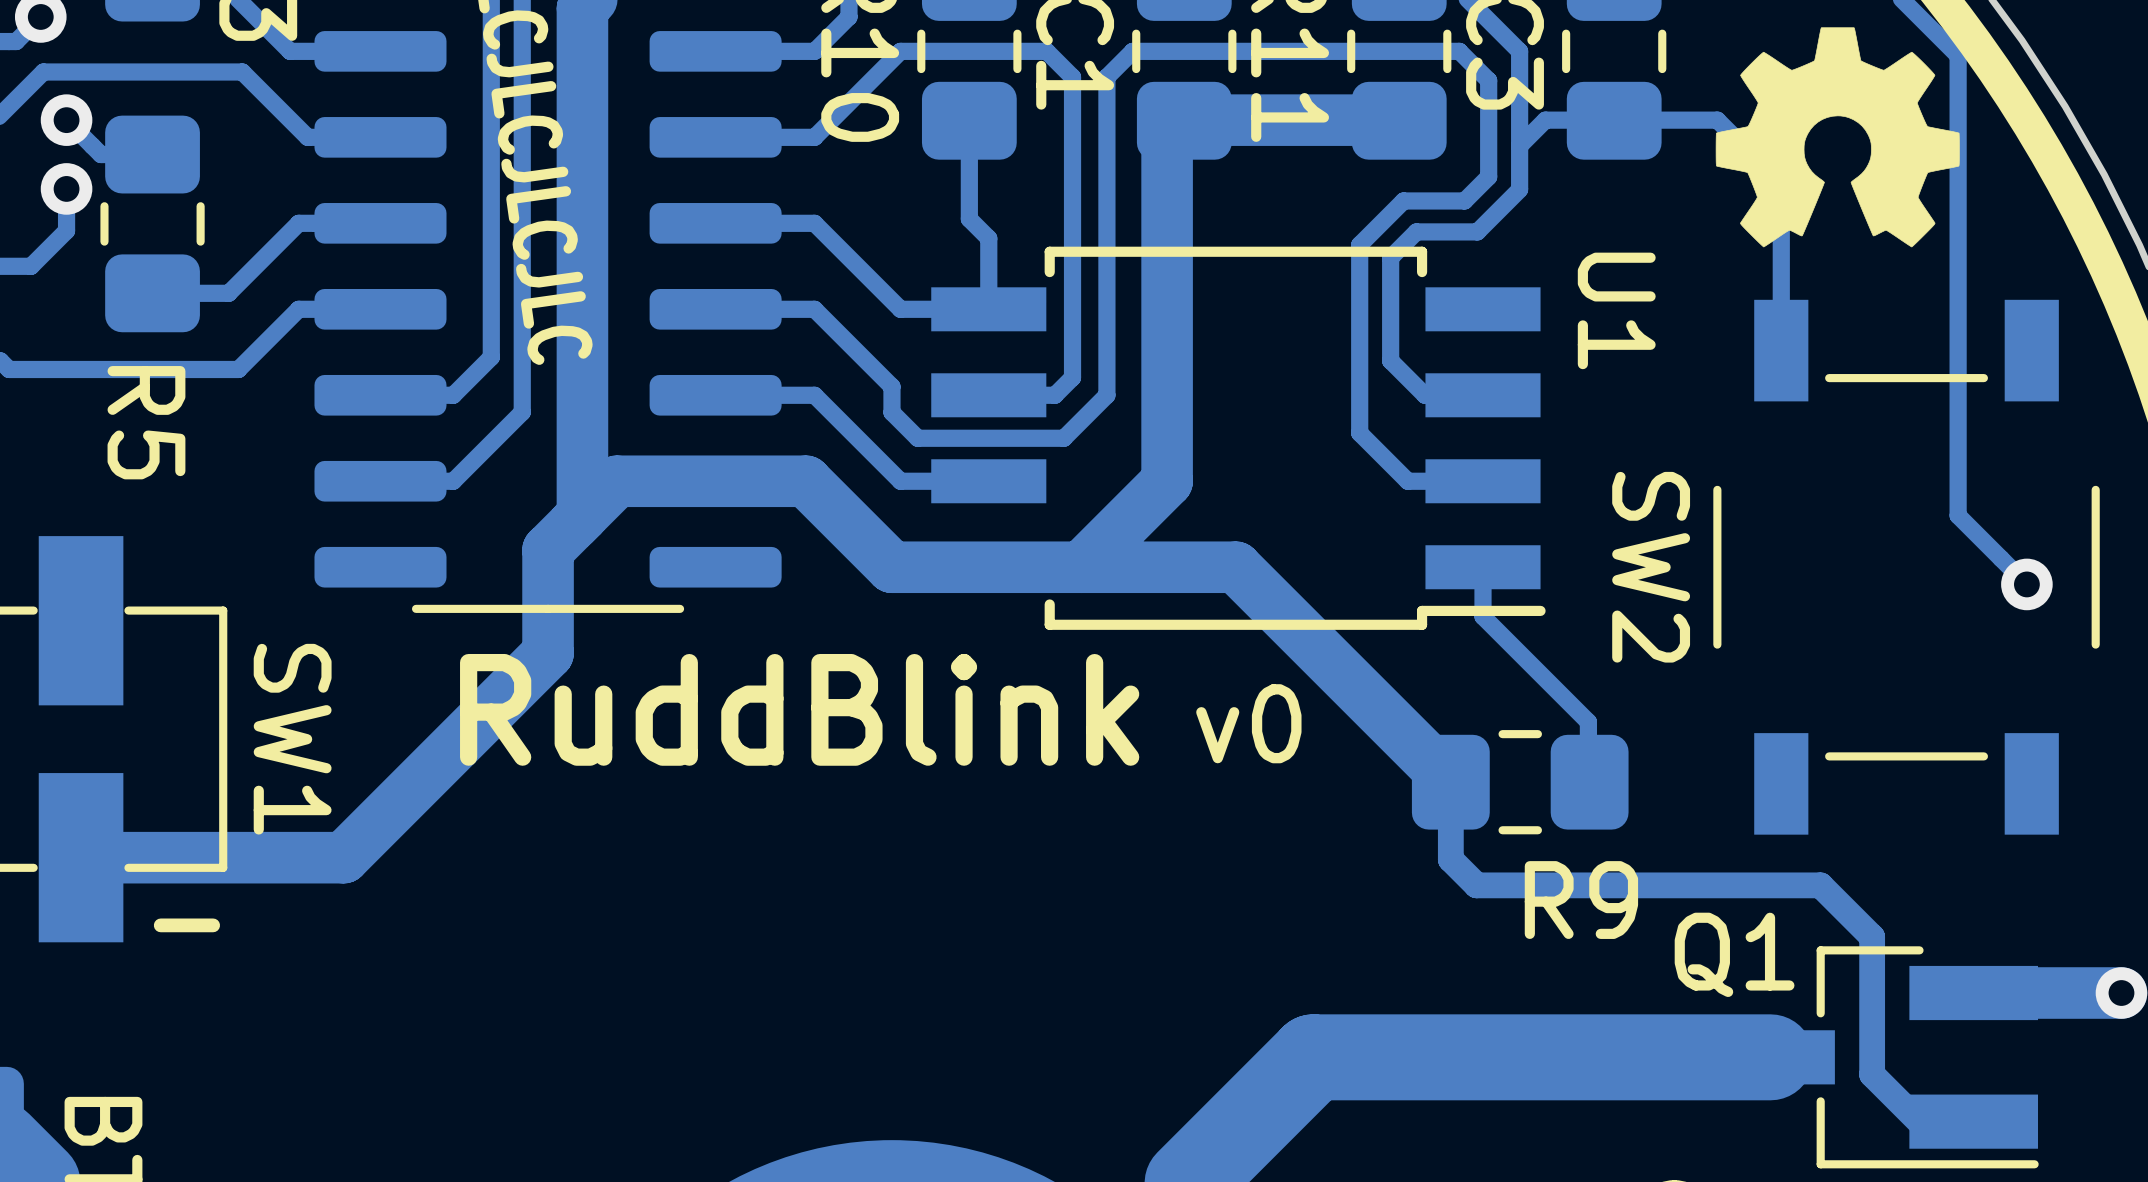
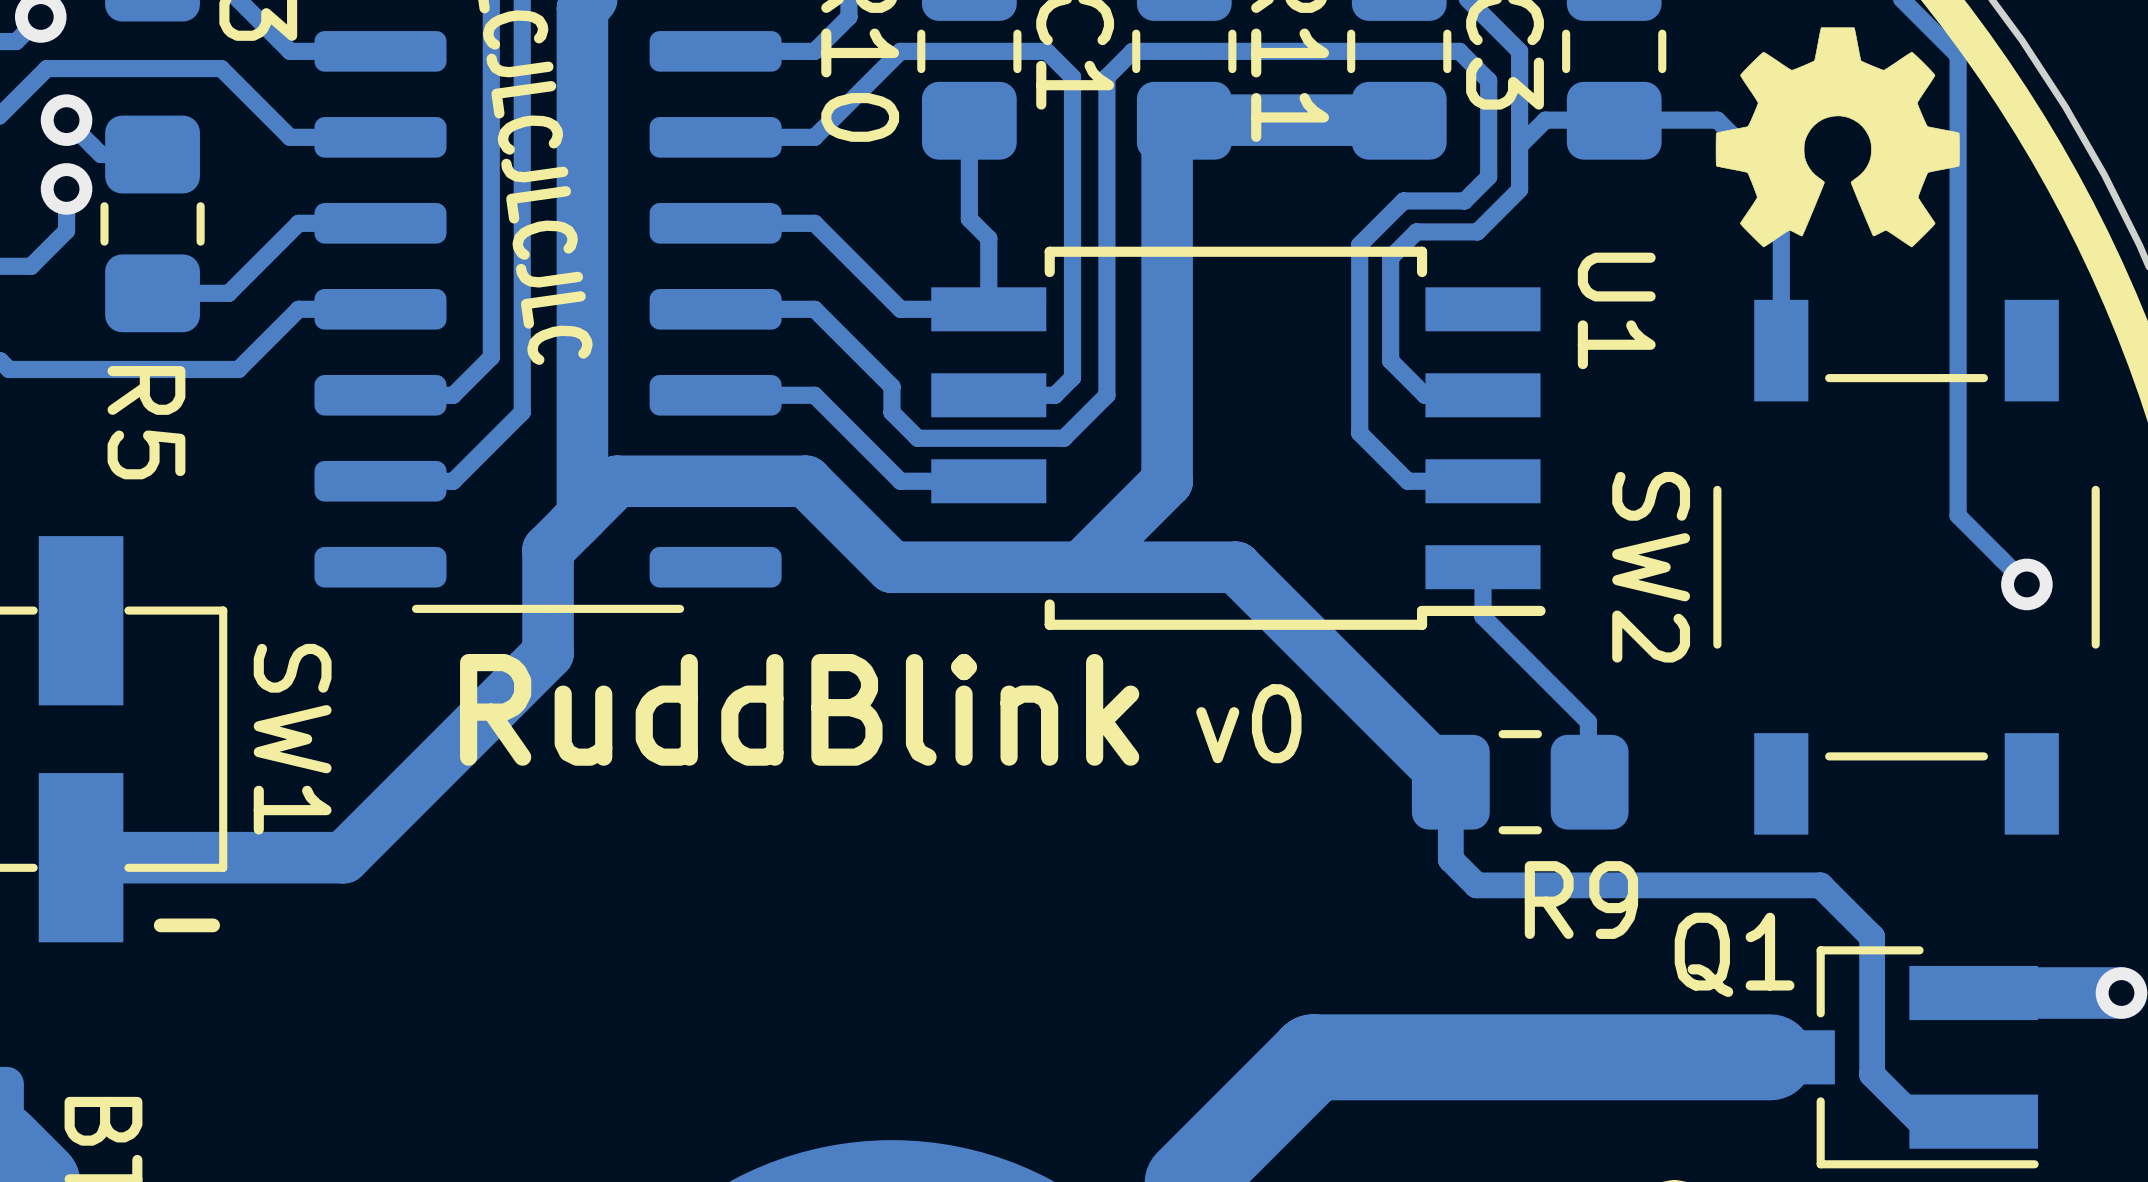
track: (43, 71) (242, 71) (307, 137) -> (43, 71) (46, 68) (221, 68) (290, 137) (307, 137)

